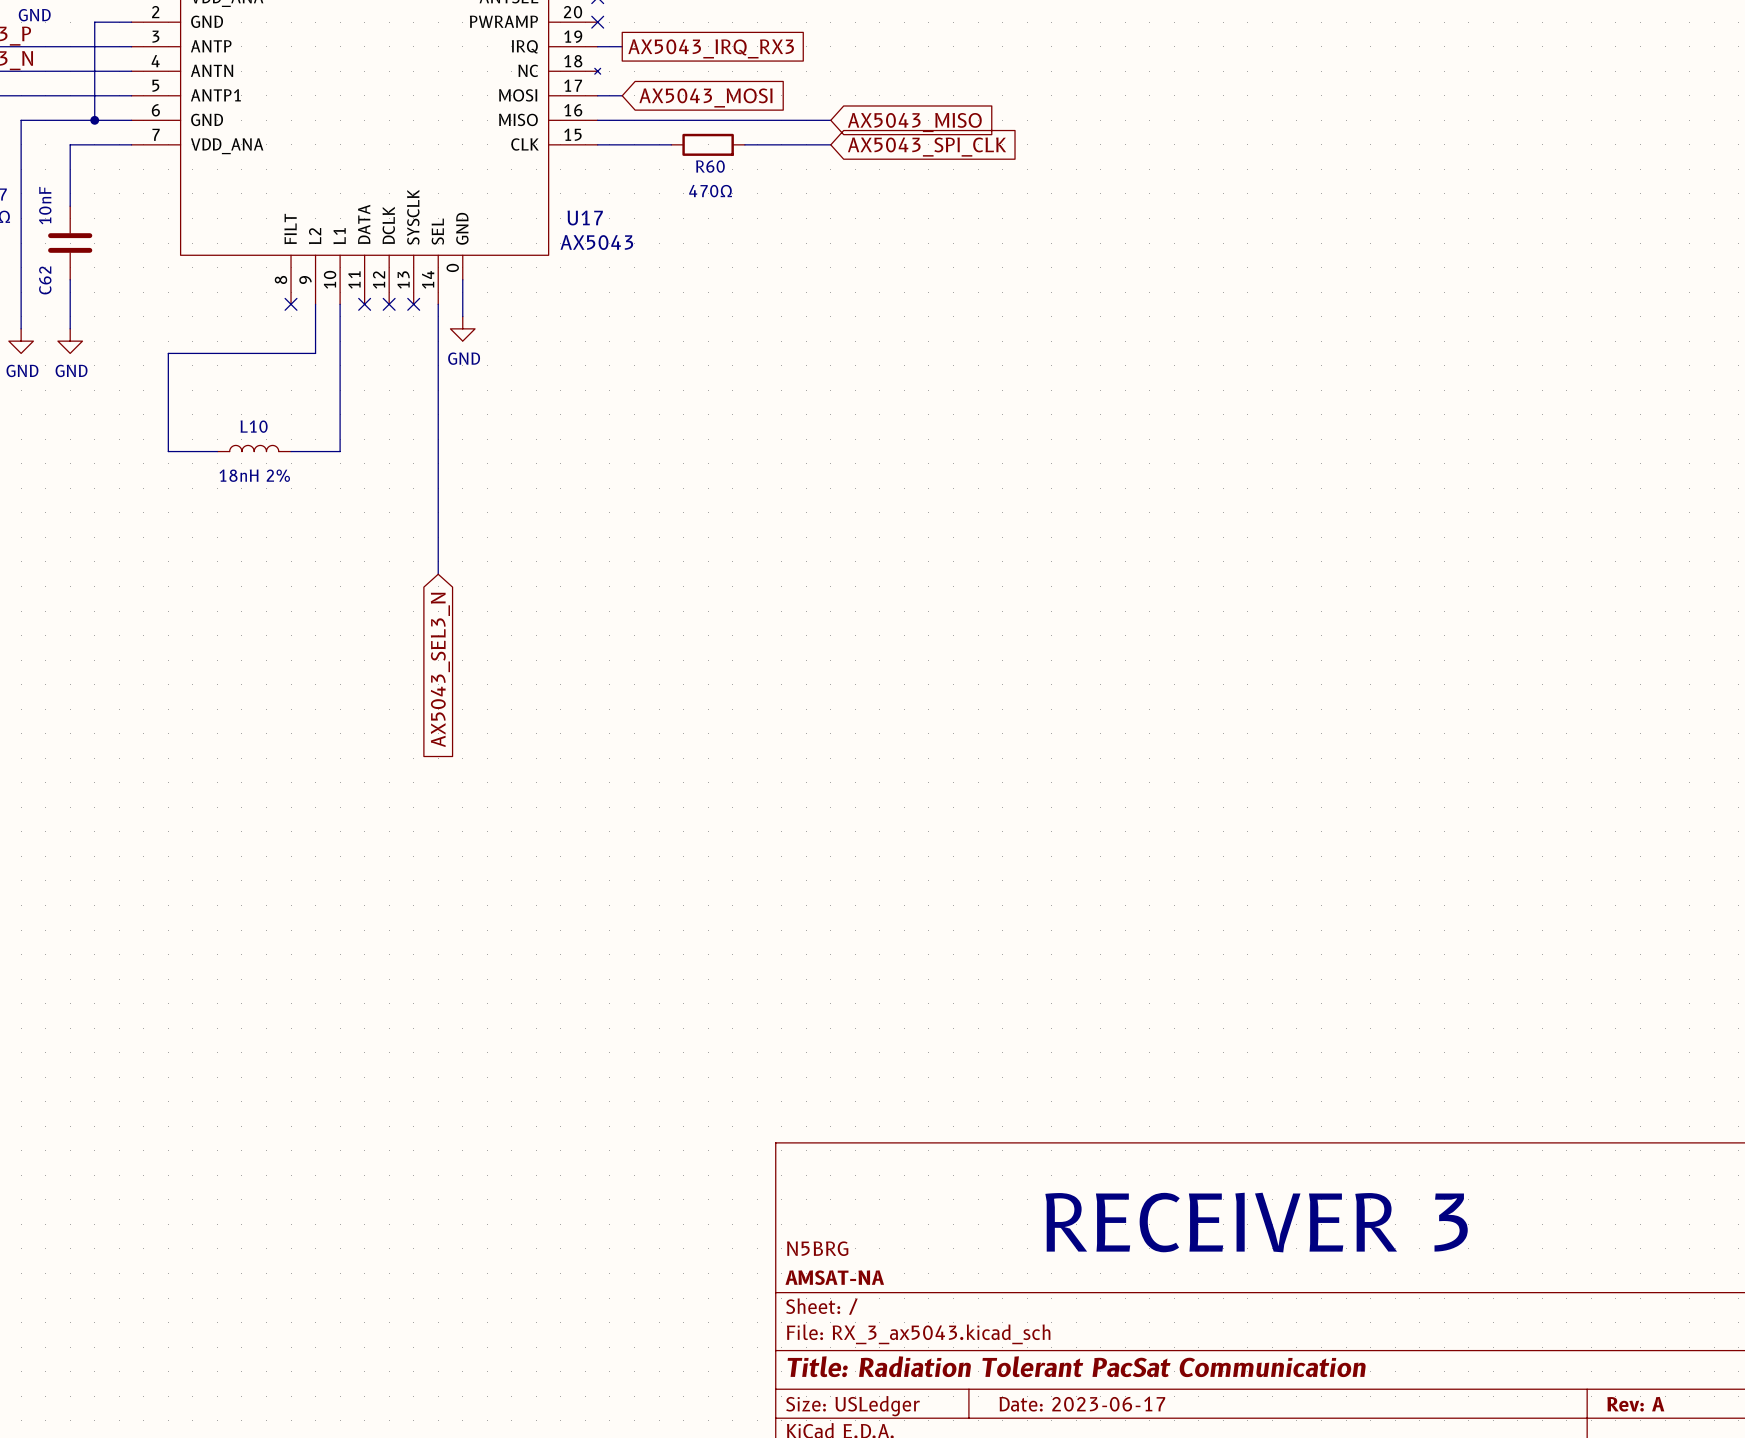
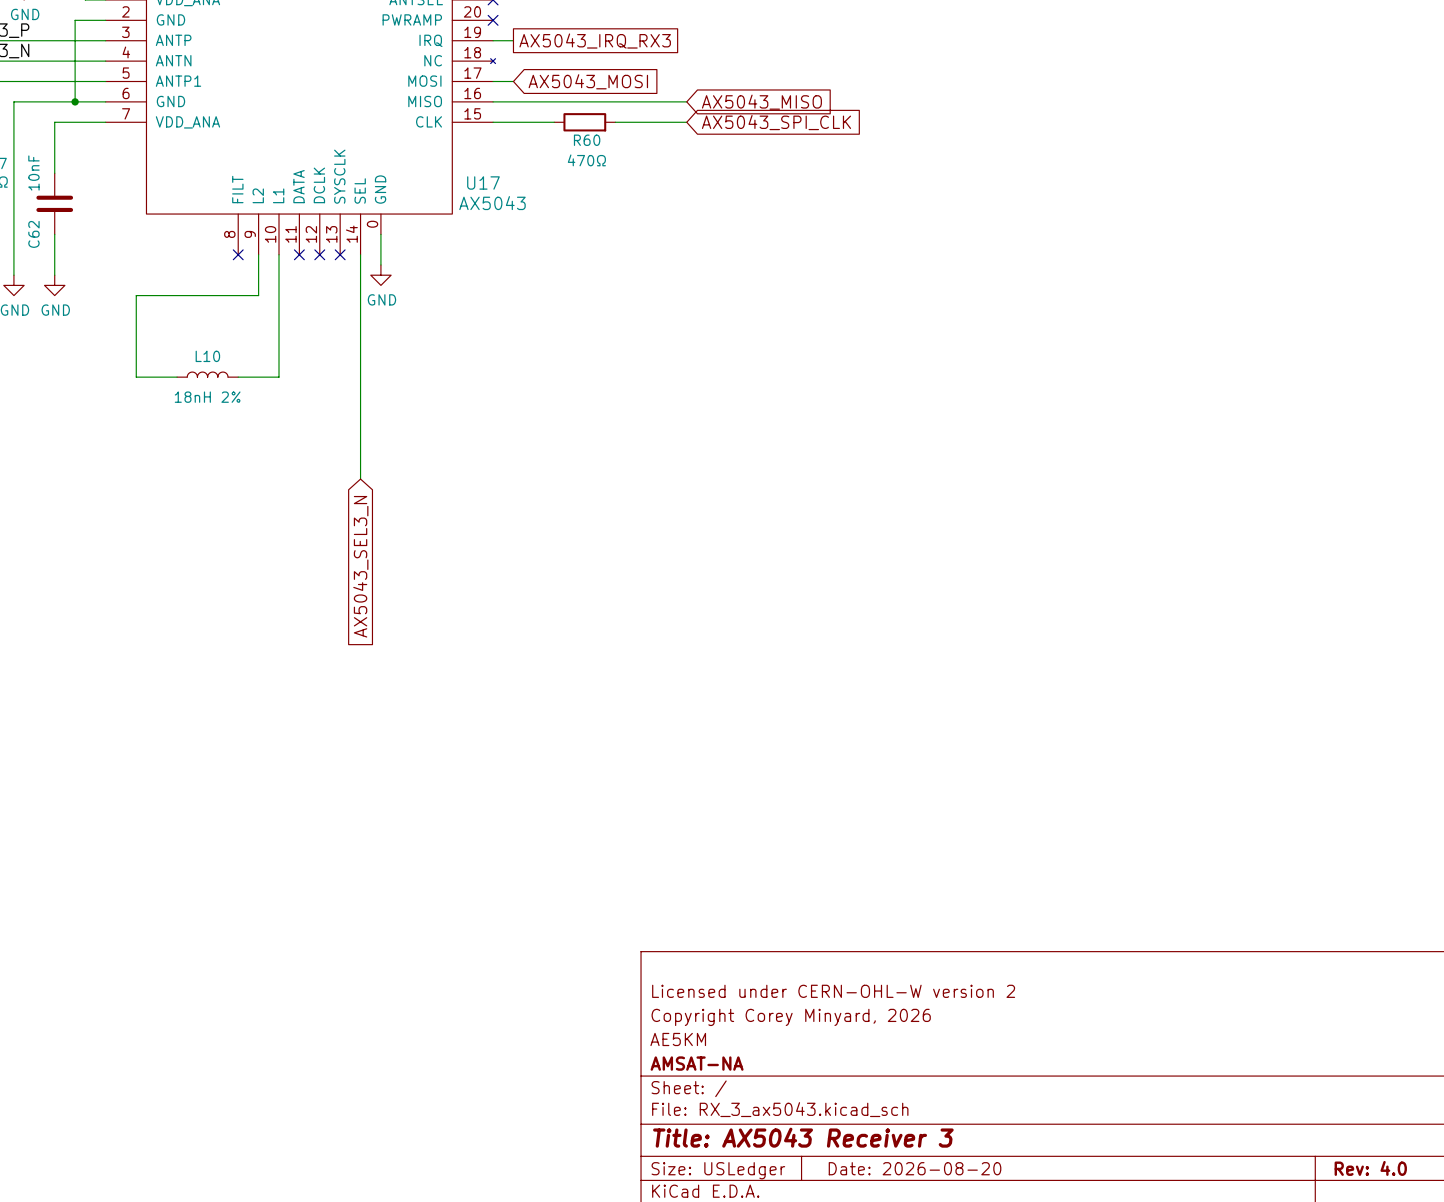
title block: none -> Licensed under CERN-OHL-W version 2 (833, 991)
title block: none -> Copyright Corey Minyard, 2026 (791, 1017)
text: RECEIVER 3 (1256, 1222) -> none
title block: N5BRG (817, 1248) -> AE5KM (678, 1039)
title block: Title: Radiation Tolerant PacSat Communication (1076, 1366) -> Title: AX5043 Receiver 3 (803, 1137)
title block: Date: 2023-06-17 (1082, 1404) -> Date: 2026-08-20 (915, 1168)
title block: Rev: A (1635, 1404) -> Rev: 4.0 (1370, 1168)

